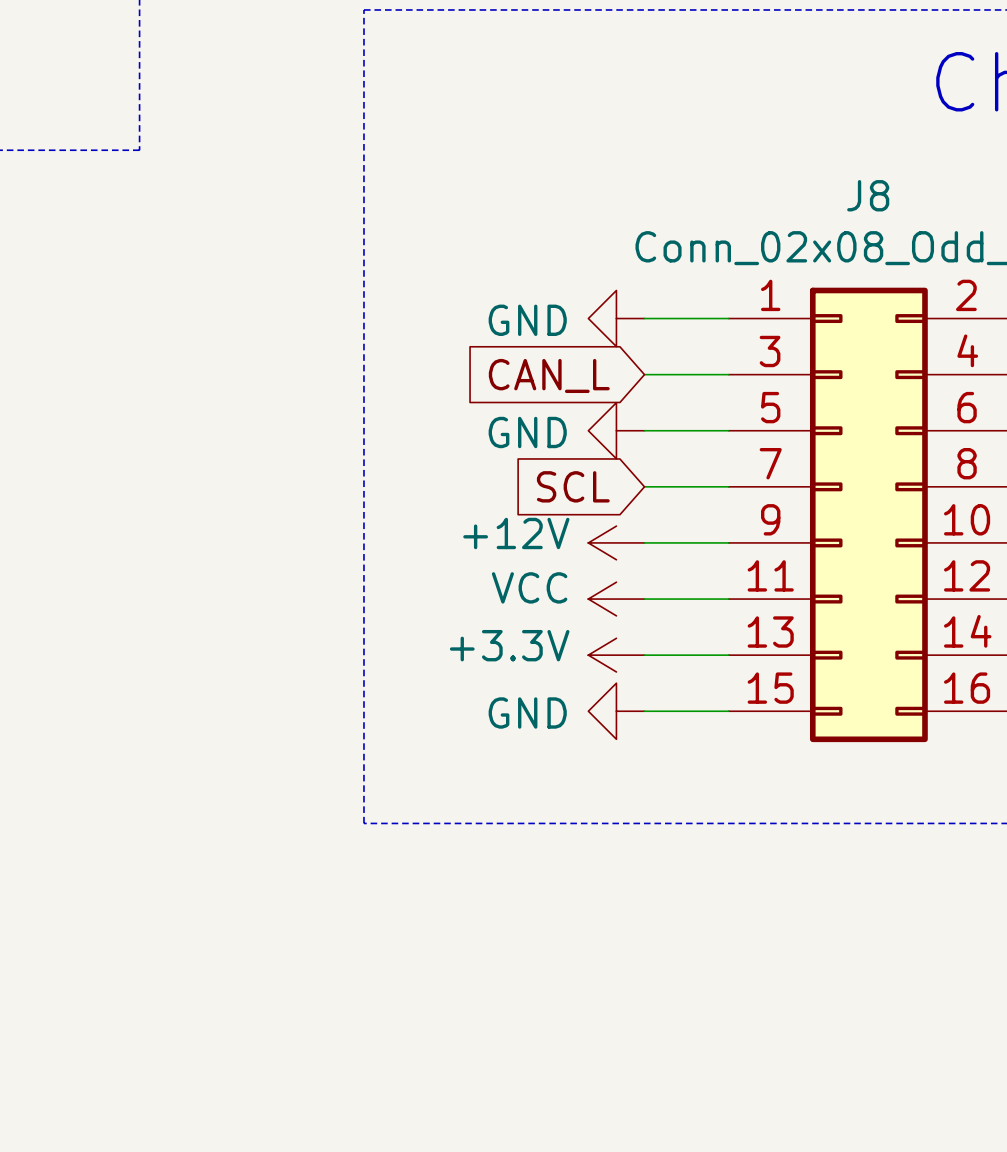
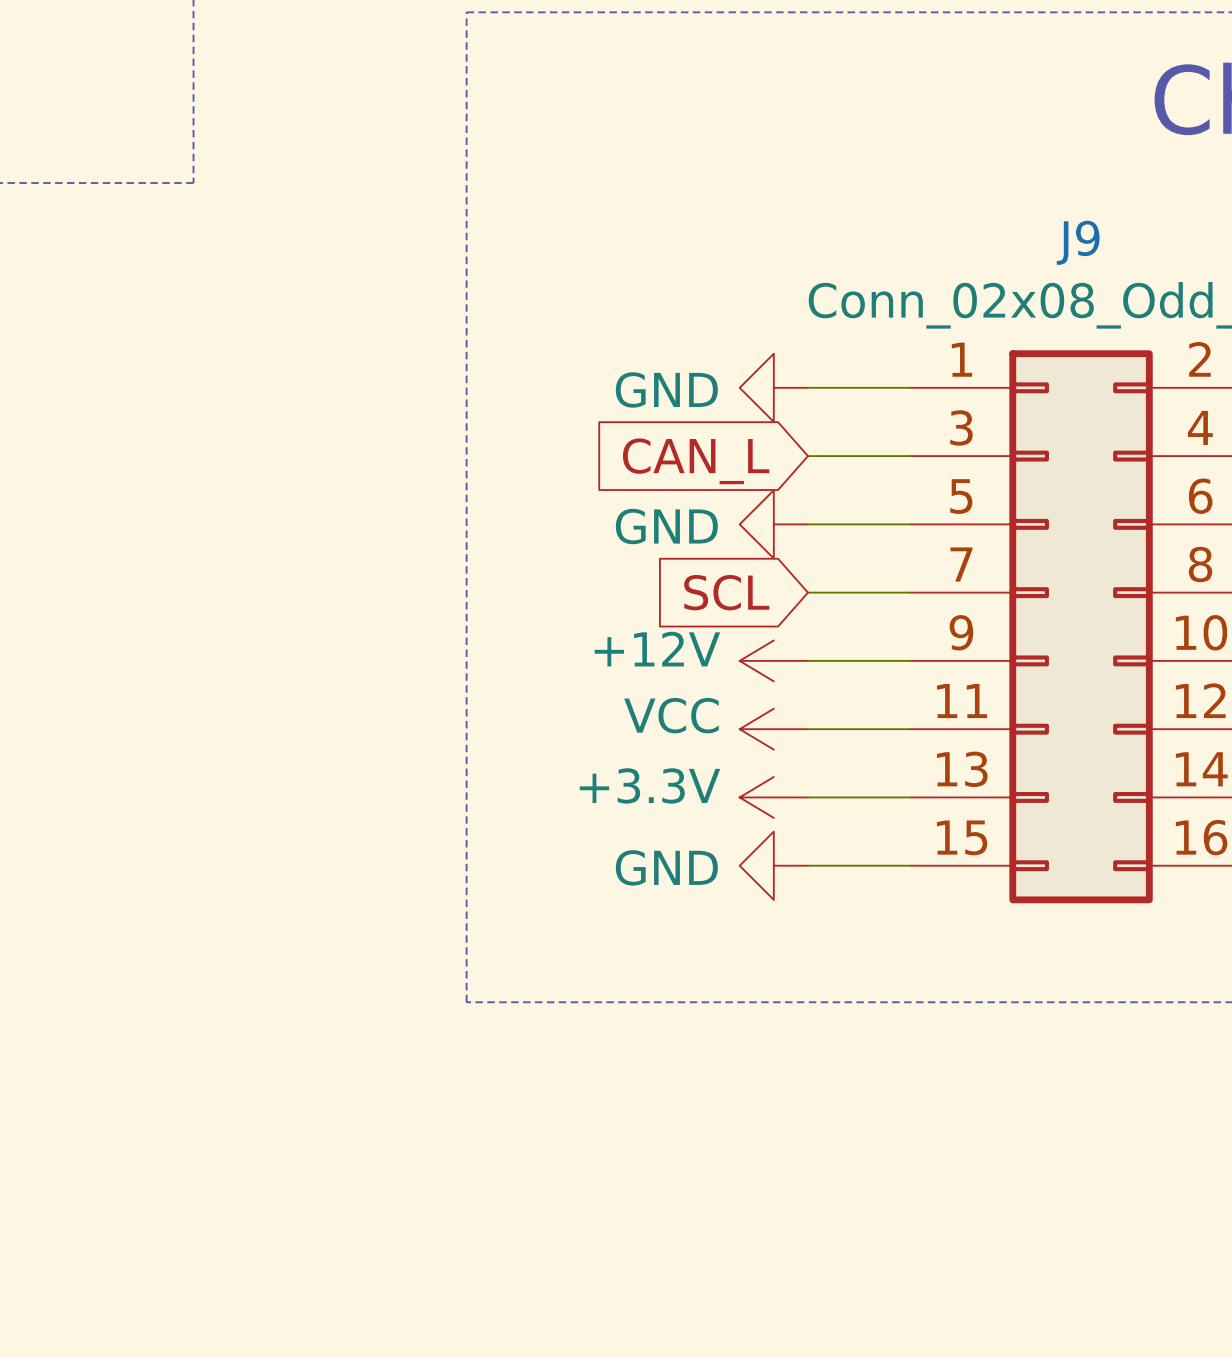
J8 name: J8 (868, 195) -> J9 (1078, 242)

